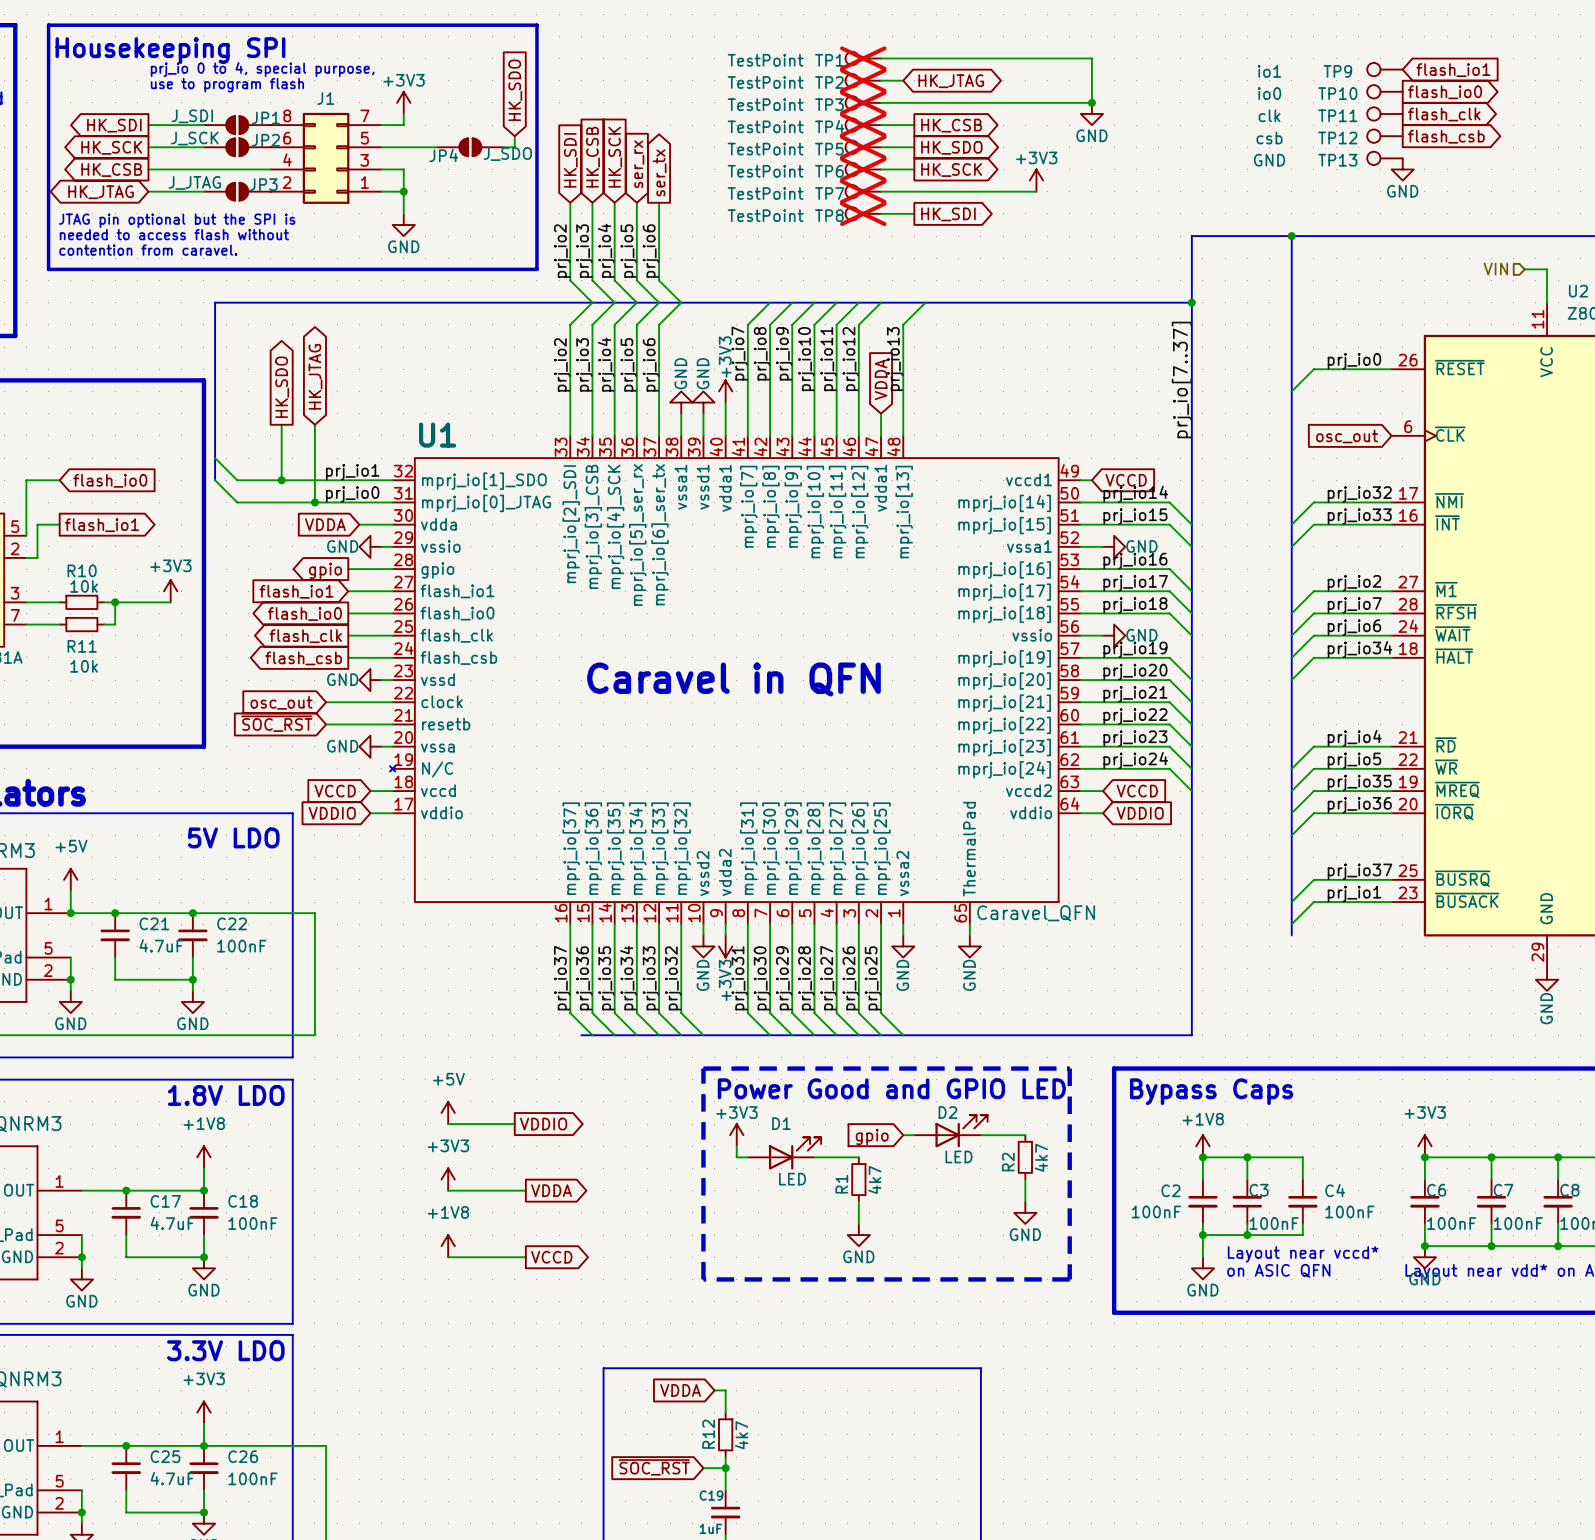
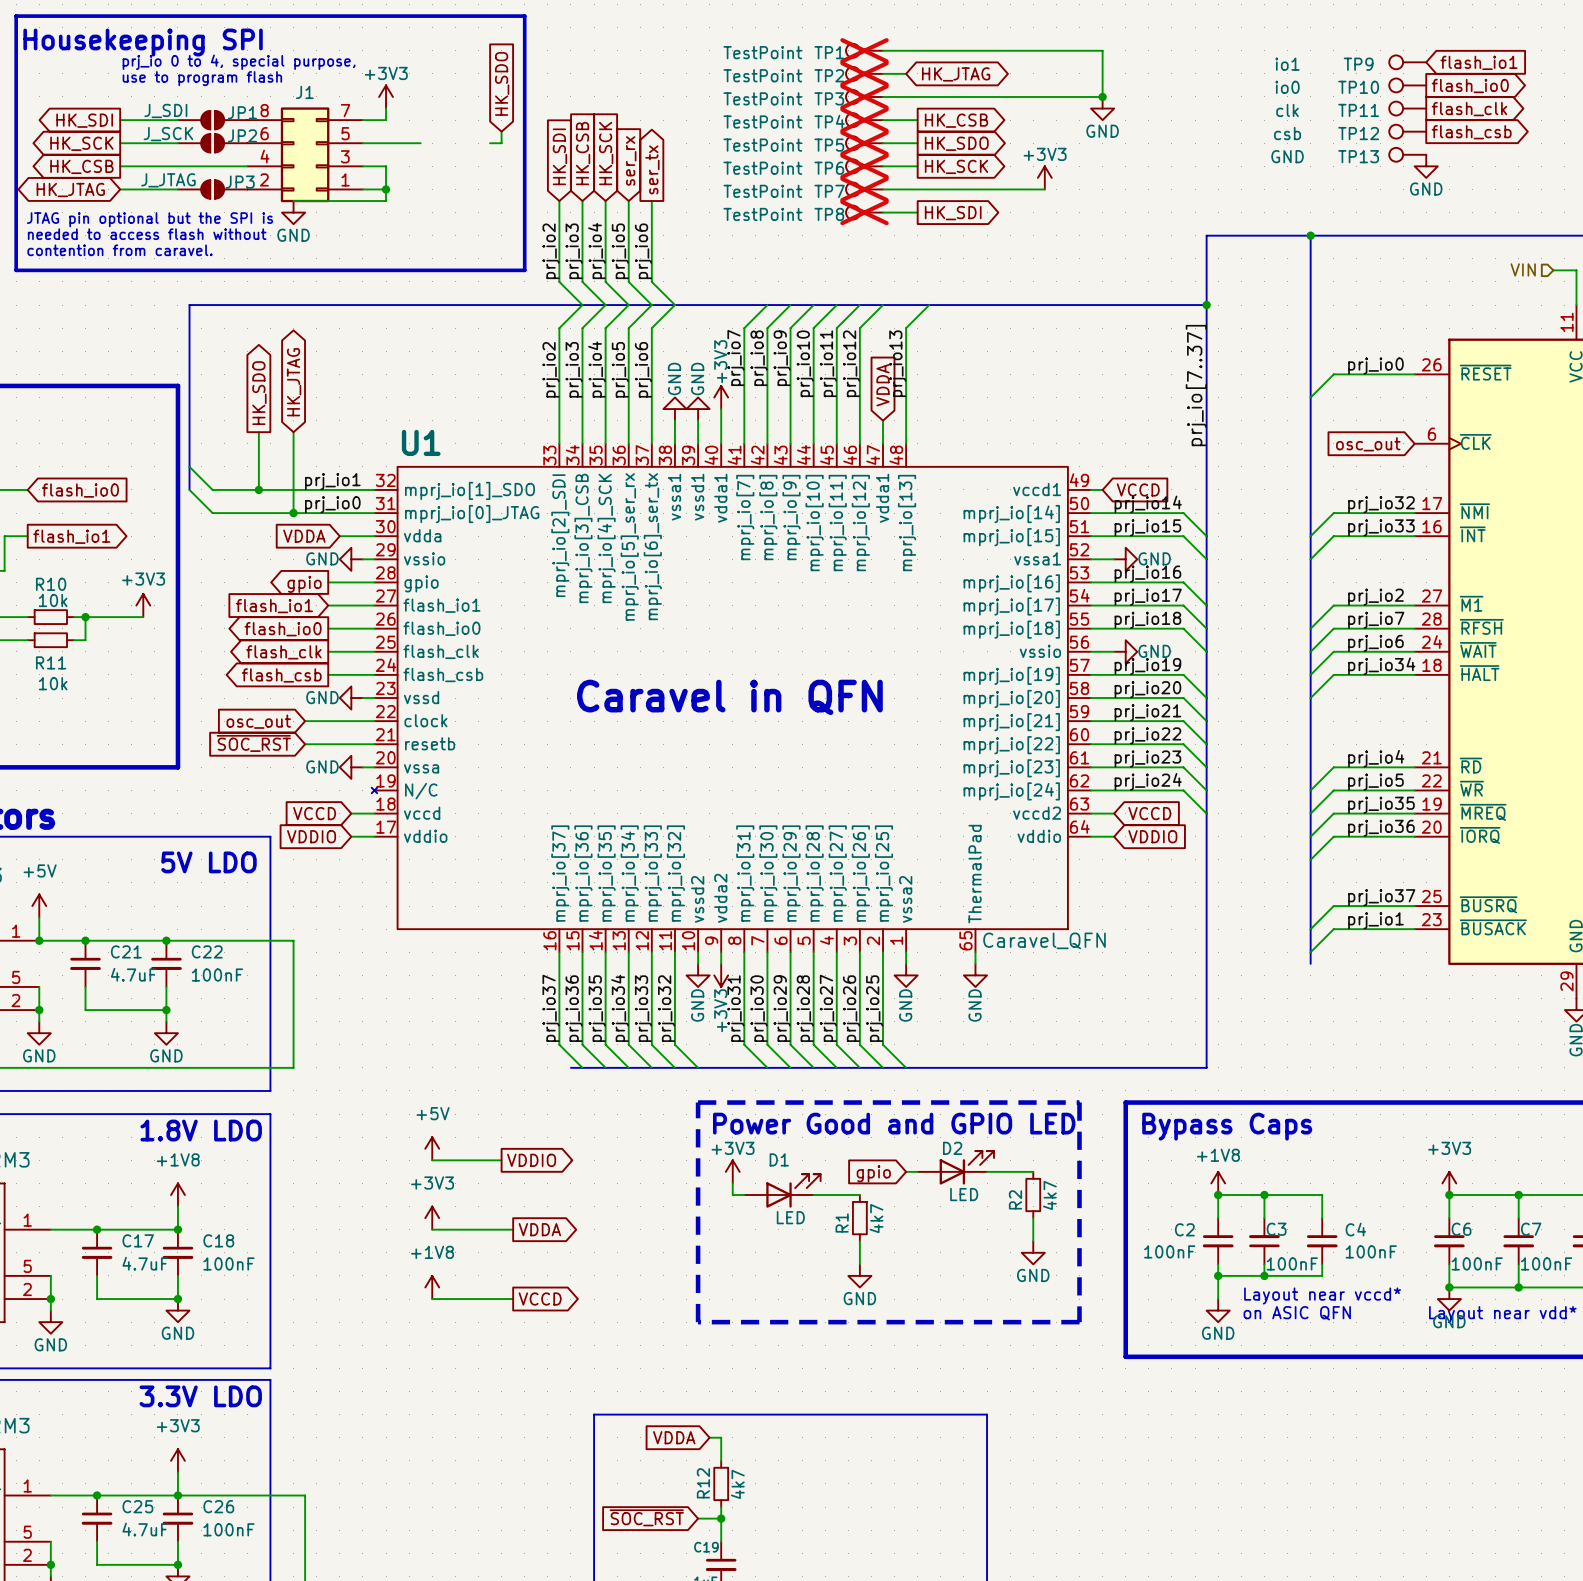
JP4: J_SDO (470, 147) -> none
wire: (403, 202) (403, 213) -> (386, 201) (293, 201)
power symbol position: GND (403, 224) -> GND (293, 212)

